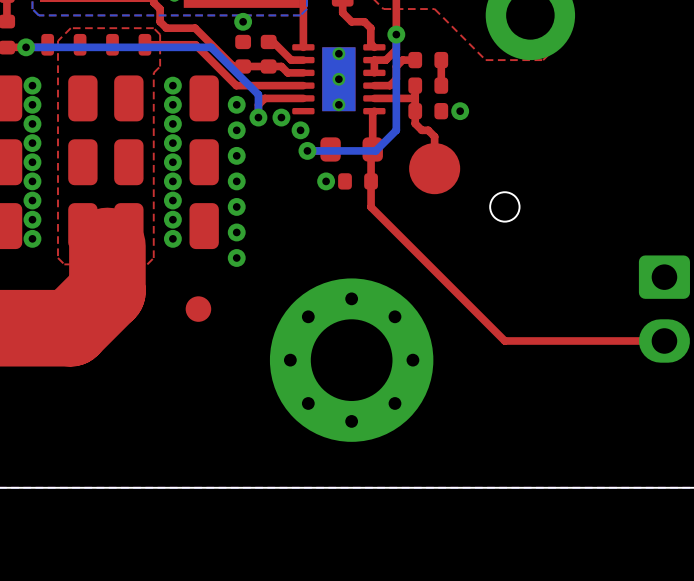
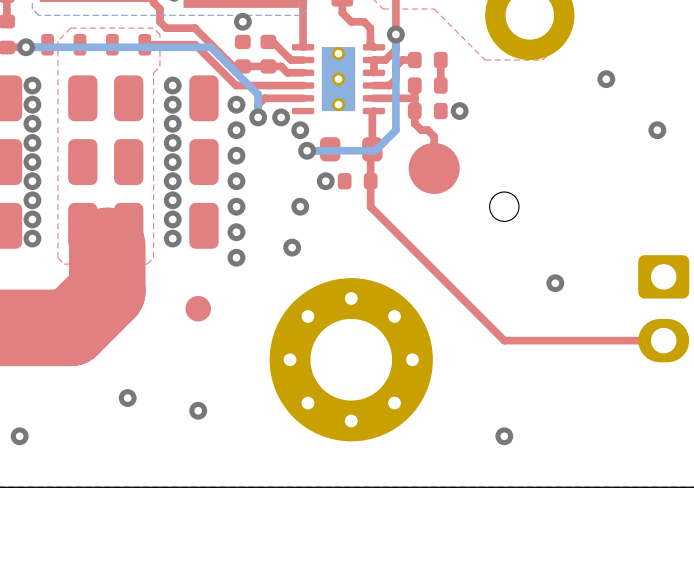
via: none -> (606, 79)
via: none -> (657, 130)
via: none -> (300, 206)
via: none -> (292, 247)
via: none -> (555, 283)
via: none -> (127, 398)
via: none -> (198, 410)
via: none -> (19, 436)
via: none -> (504, 436)

